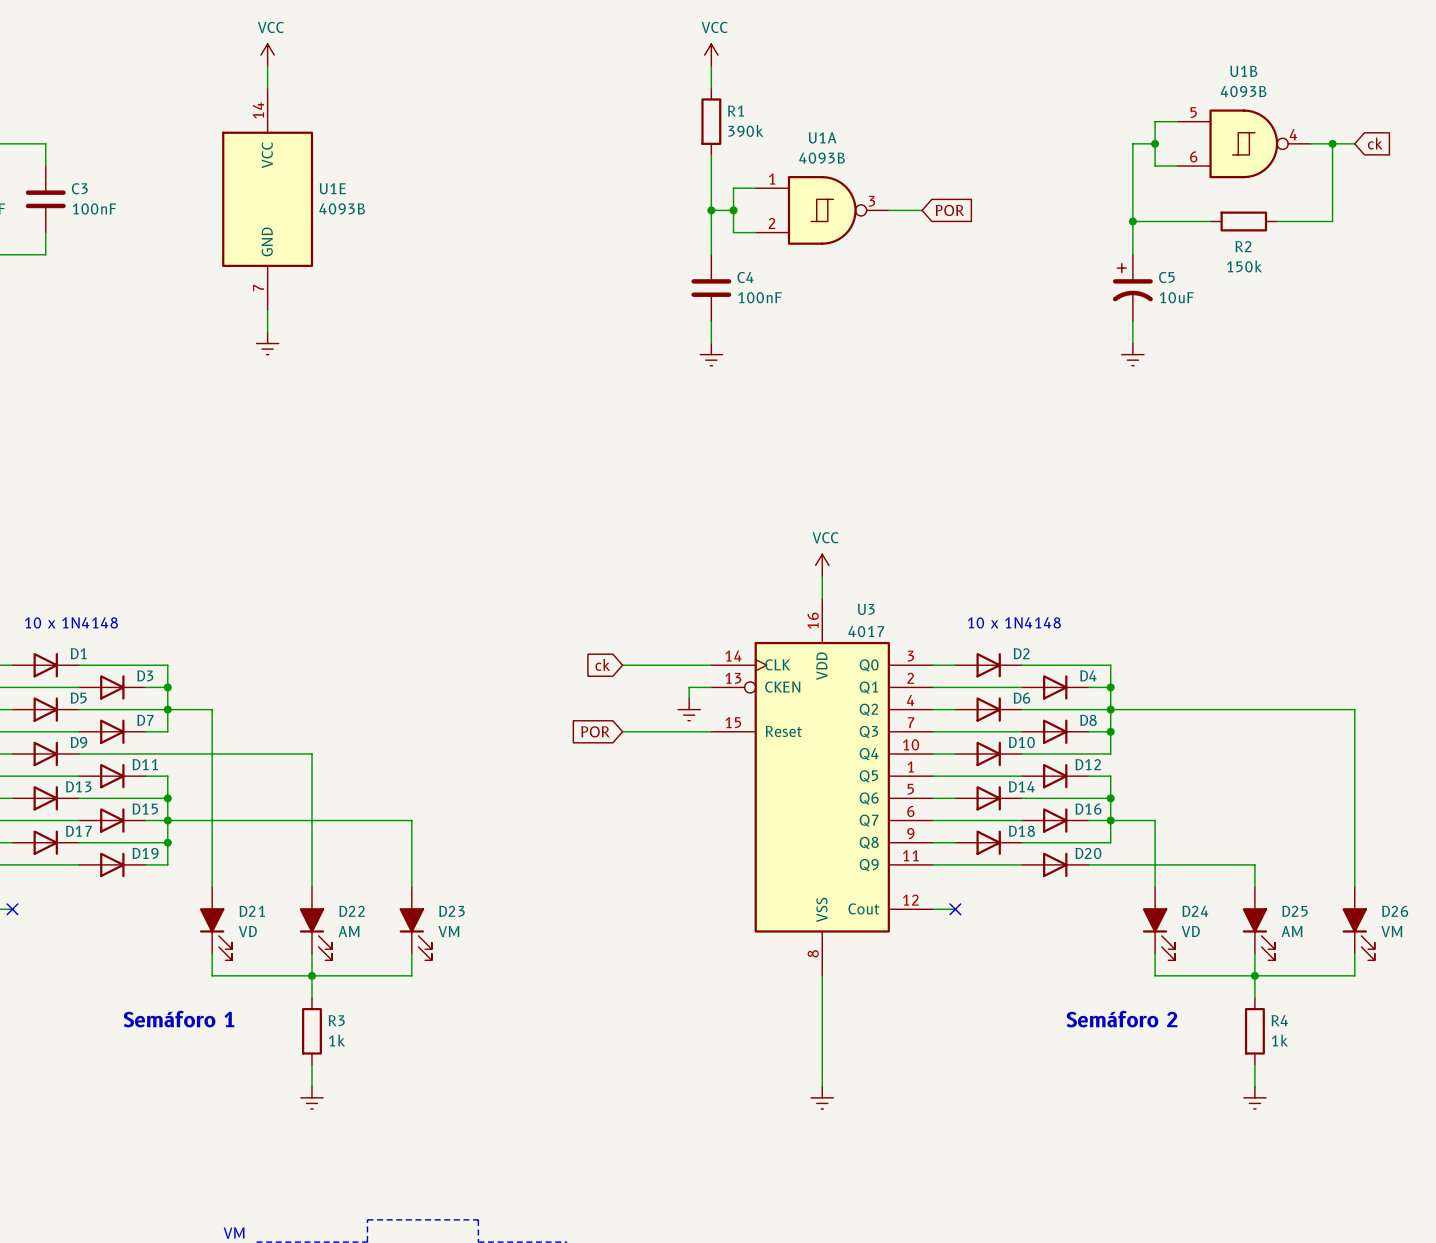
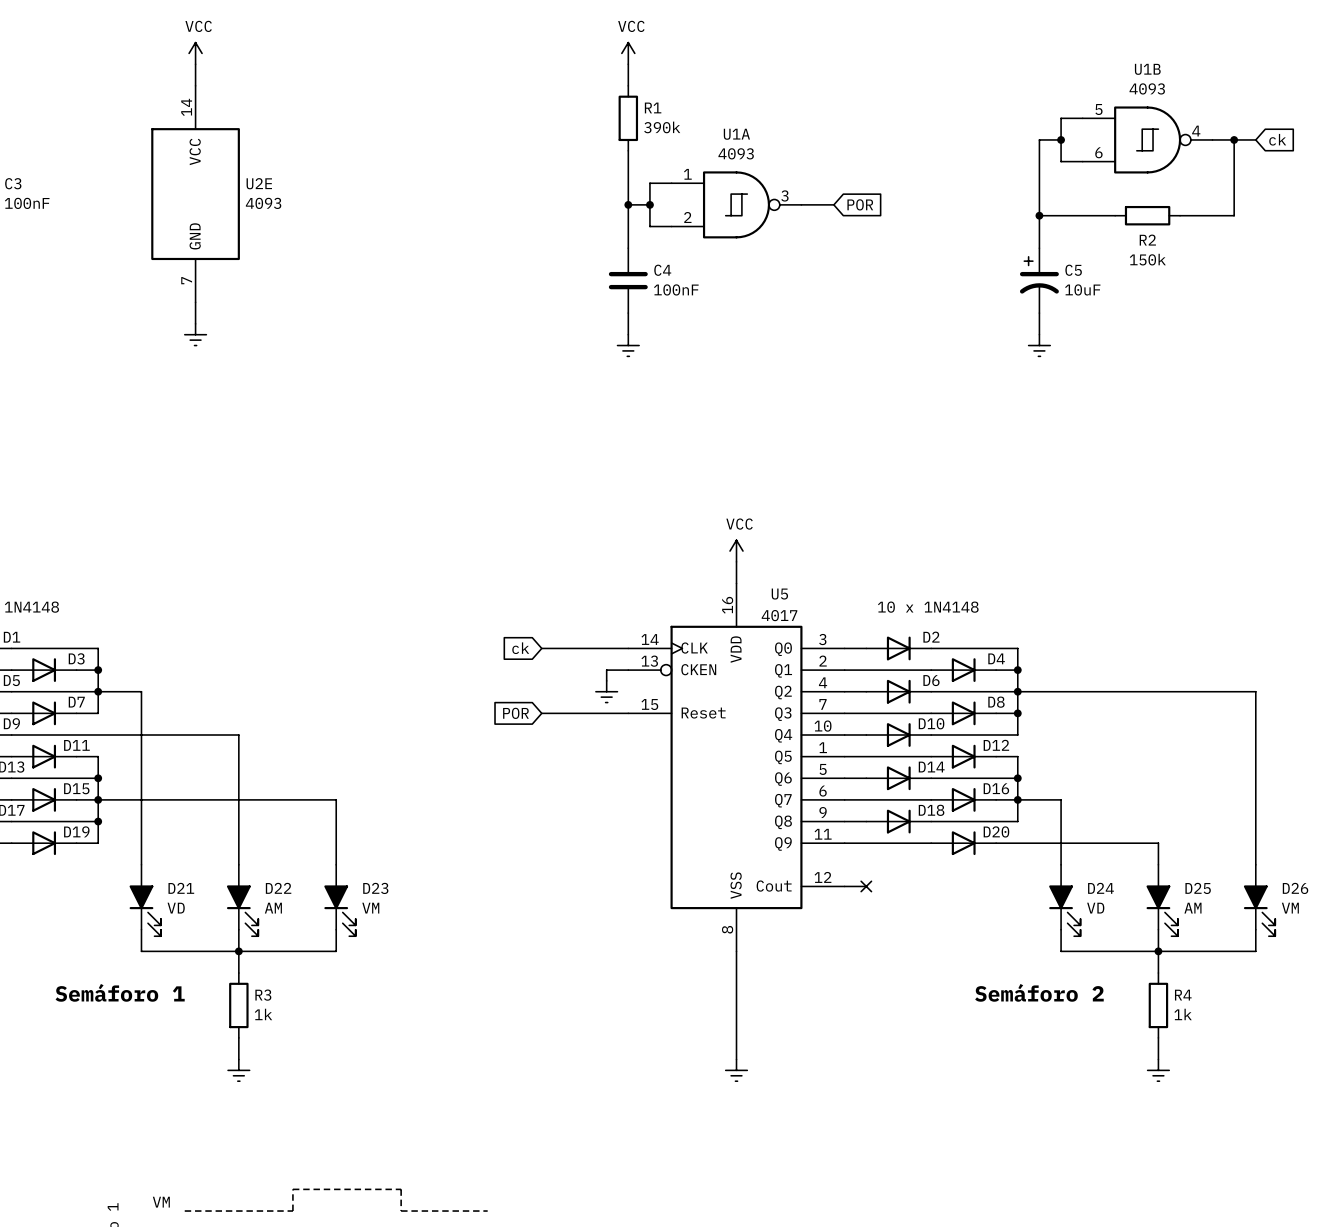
U1B value: 4093B (1243, 91) -> 4093 (1147, 88)
U1A value: 4093B (822, 158) -> 4093 (736, 153)
U1E name: U1E (332, 188) -> U2E (259, 183)
U1E value: 4093B (342, 208) -> 4093 (263, 203)
U3 name: U3 (866, 609) -> U5 (779, 594)

